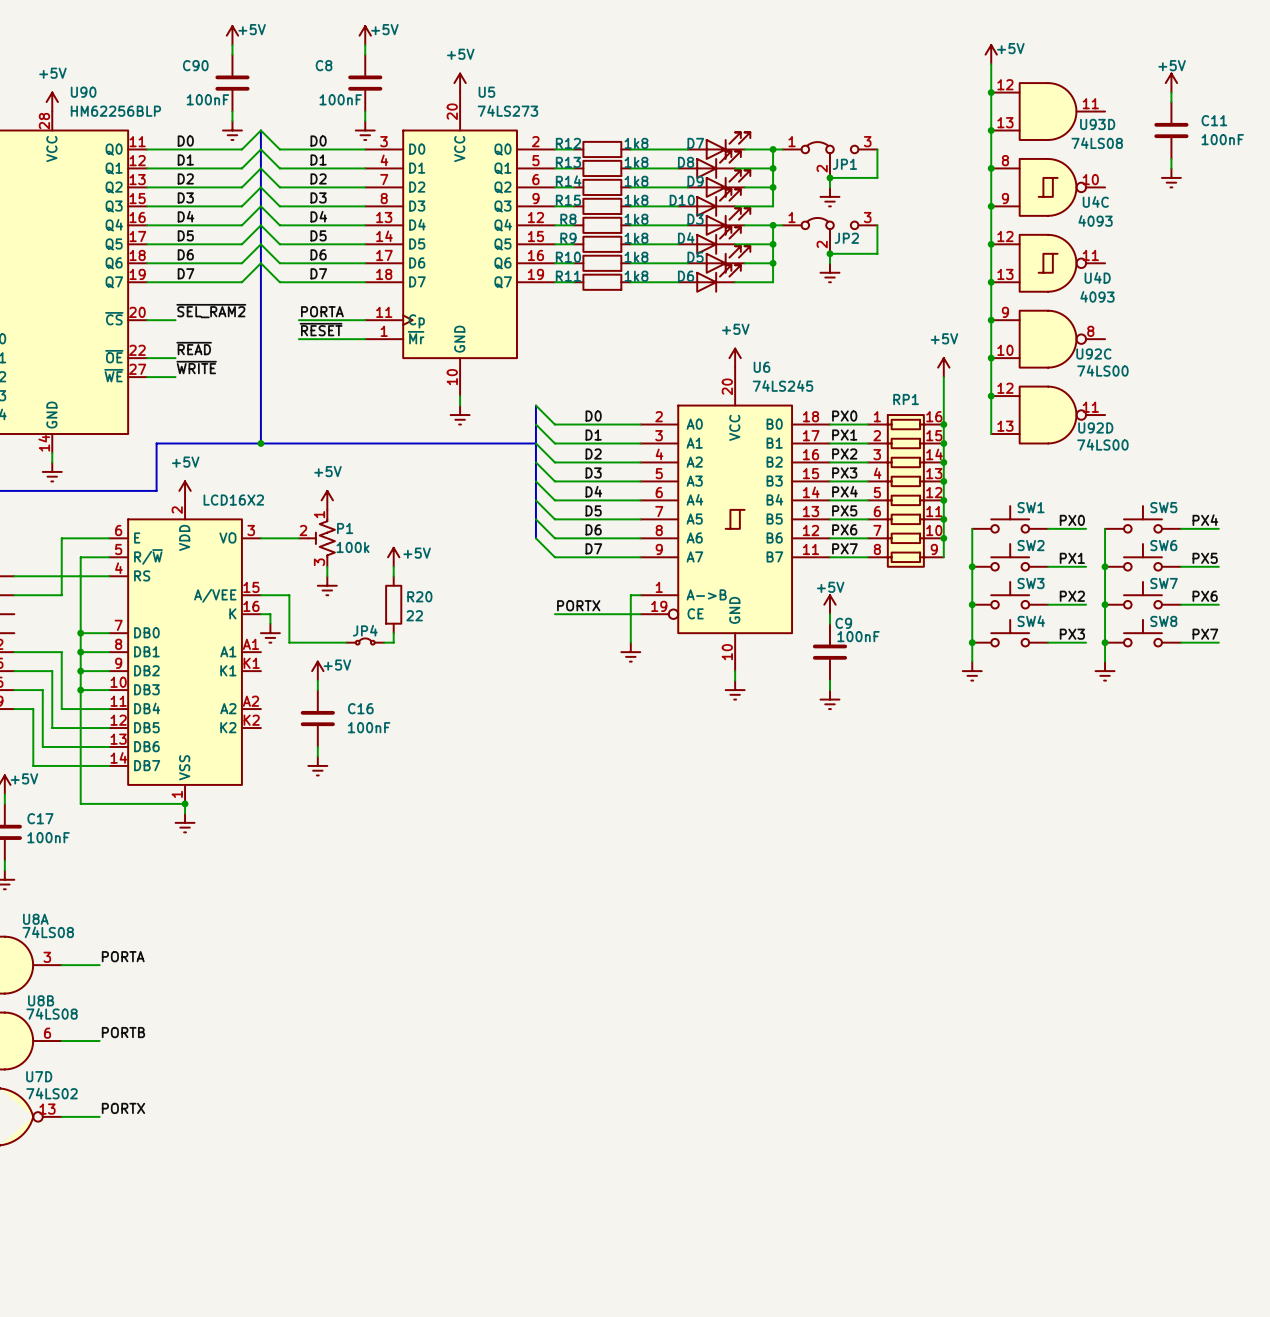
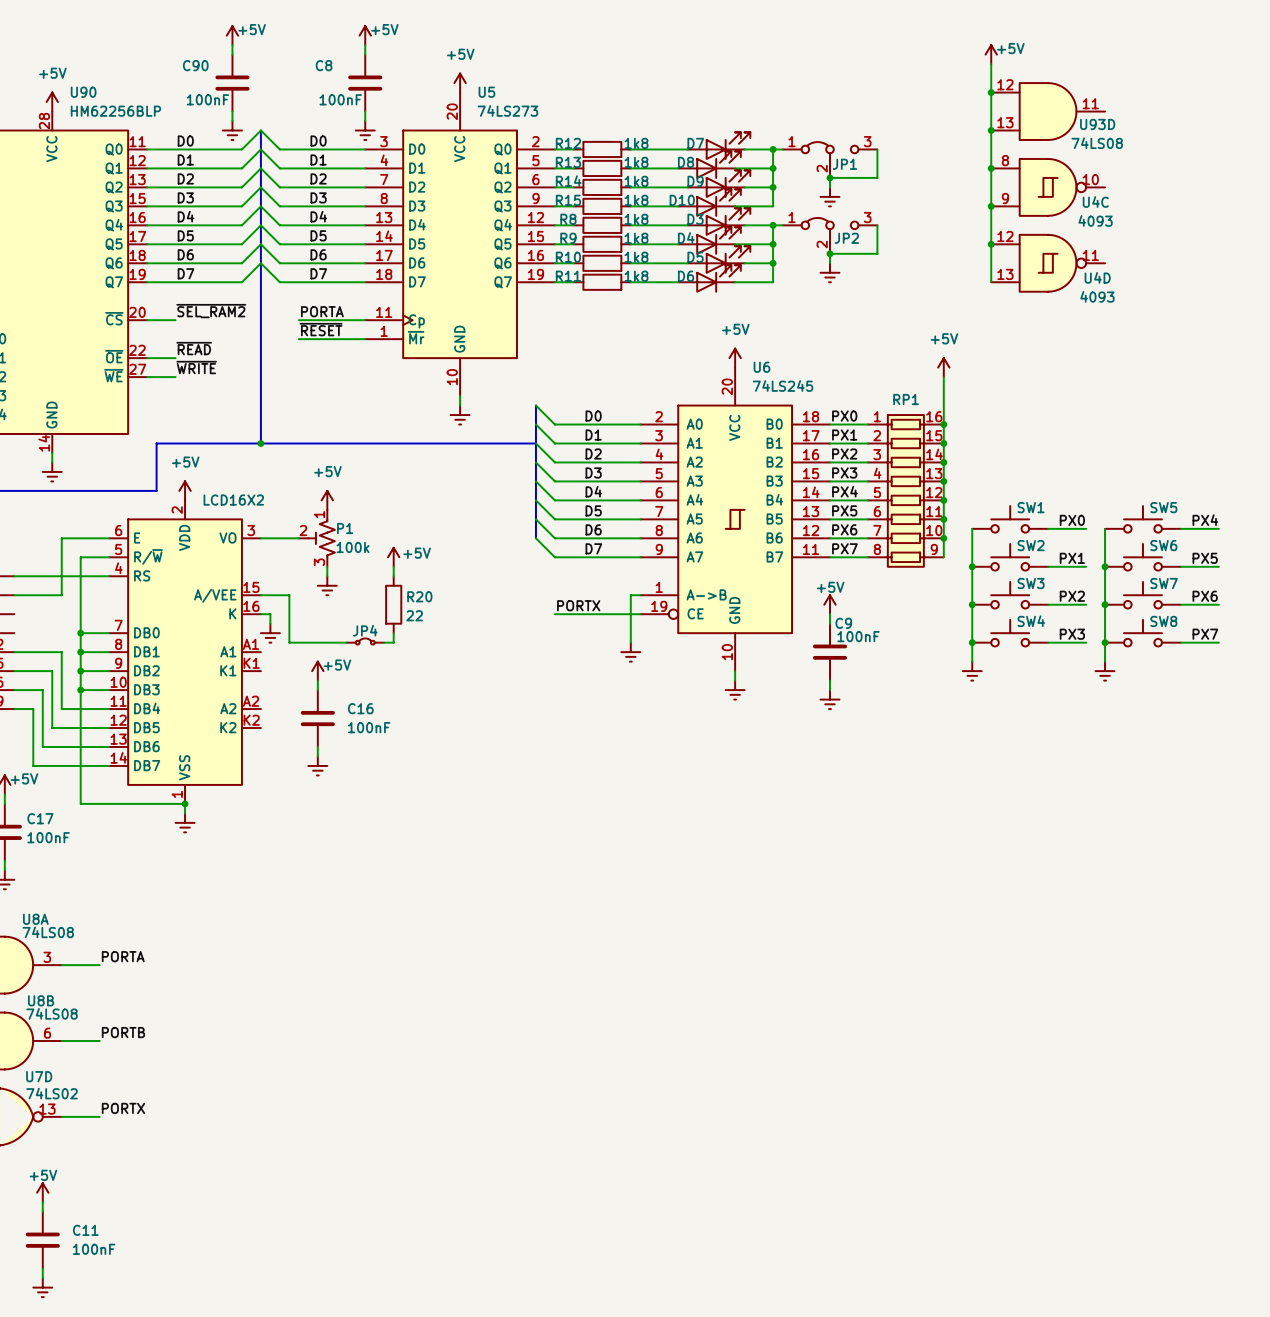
power symbol: +5V (1171, 83) -> none
wire: (1171, 92) (1171, 102) -> none
C11 position: (1171, 130) -> (42, 1240)
wire: (1171, 158) (1171, 168) -> none
power symbol: (1171, 177) -> none
wire: (991, 282) (991, 434) -> none
junction: (991, 282) -> none
junction: (991, 320) -> none
U92C: 74LS00 (1048, 339) -> none
junction: (991, 358) -> none
junction: (991, 396) -> none
U92D: 74LS00 (1048, 415) -> none
power symbol: none -> +5V (42, 1192)
wire: none -> (42, 1202) (42, 1211)
wire: none -> (42, 1268) (42, 1278)
power symbol: none -> (42, 1287)

